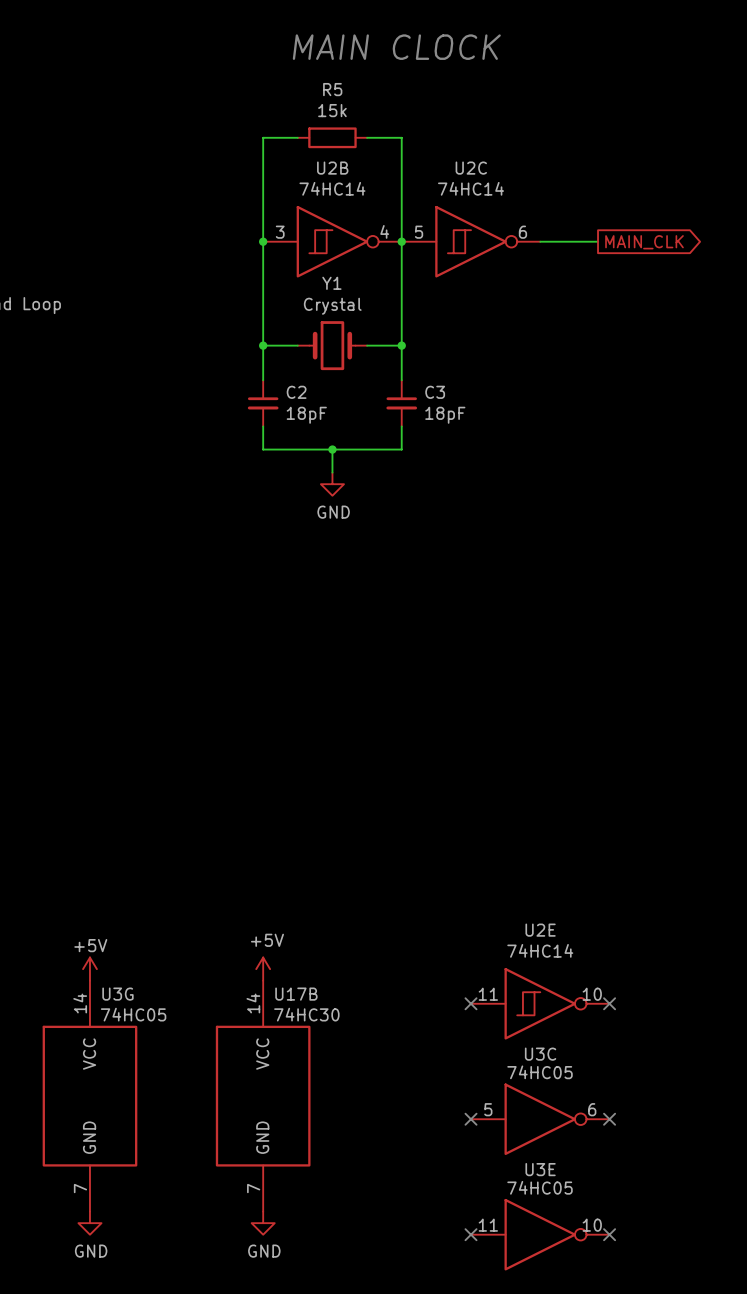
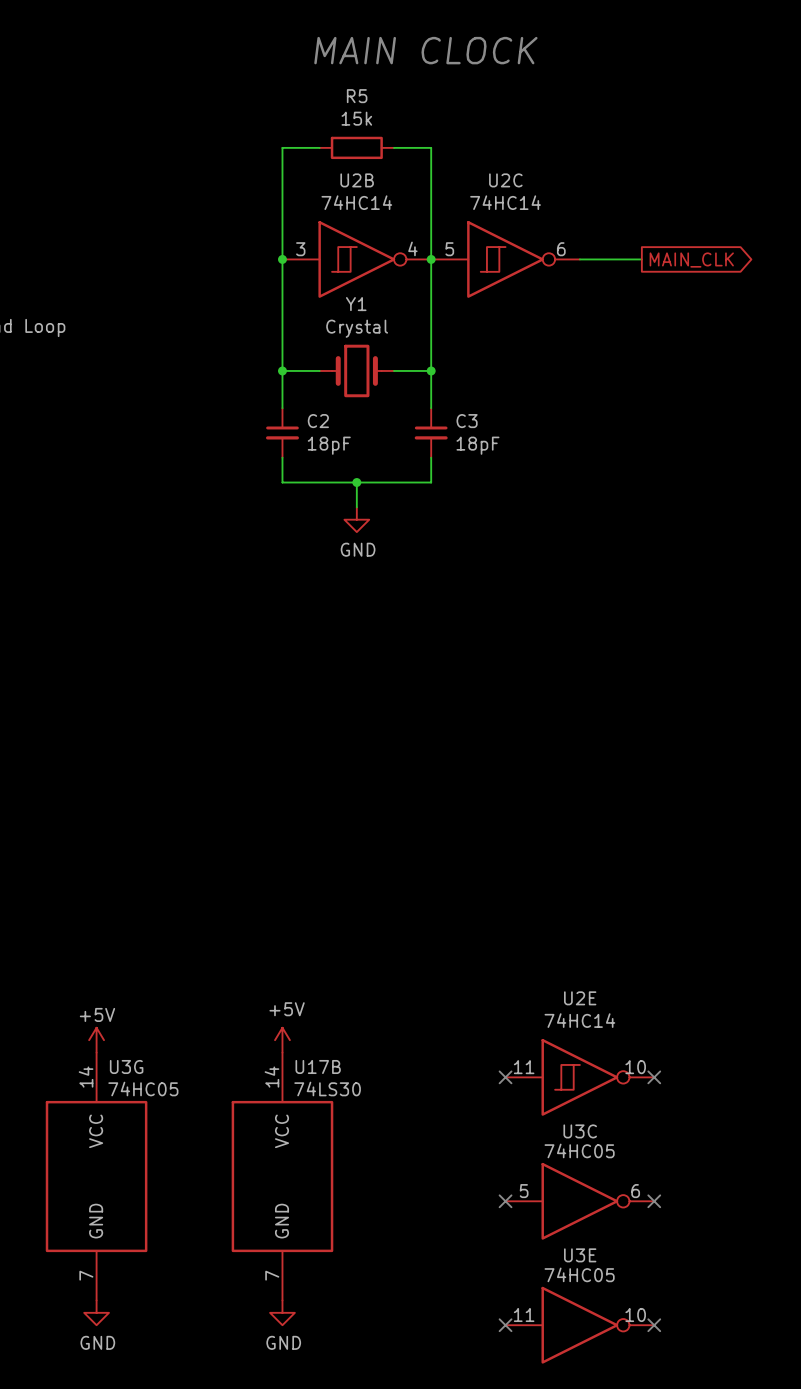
U17B value: 74HC30 (306, 1014) -> 74LS30 (327, 1089)

